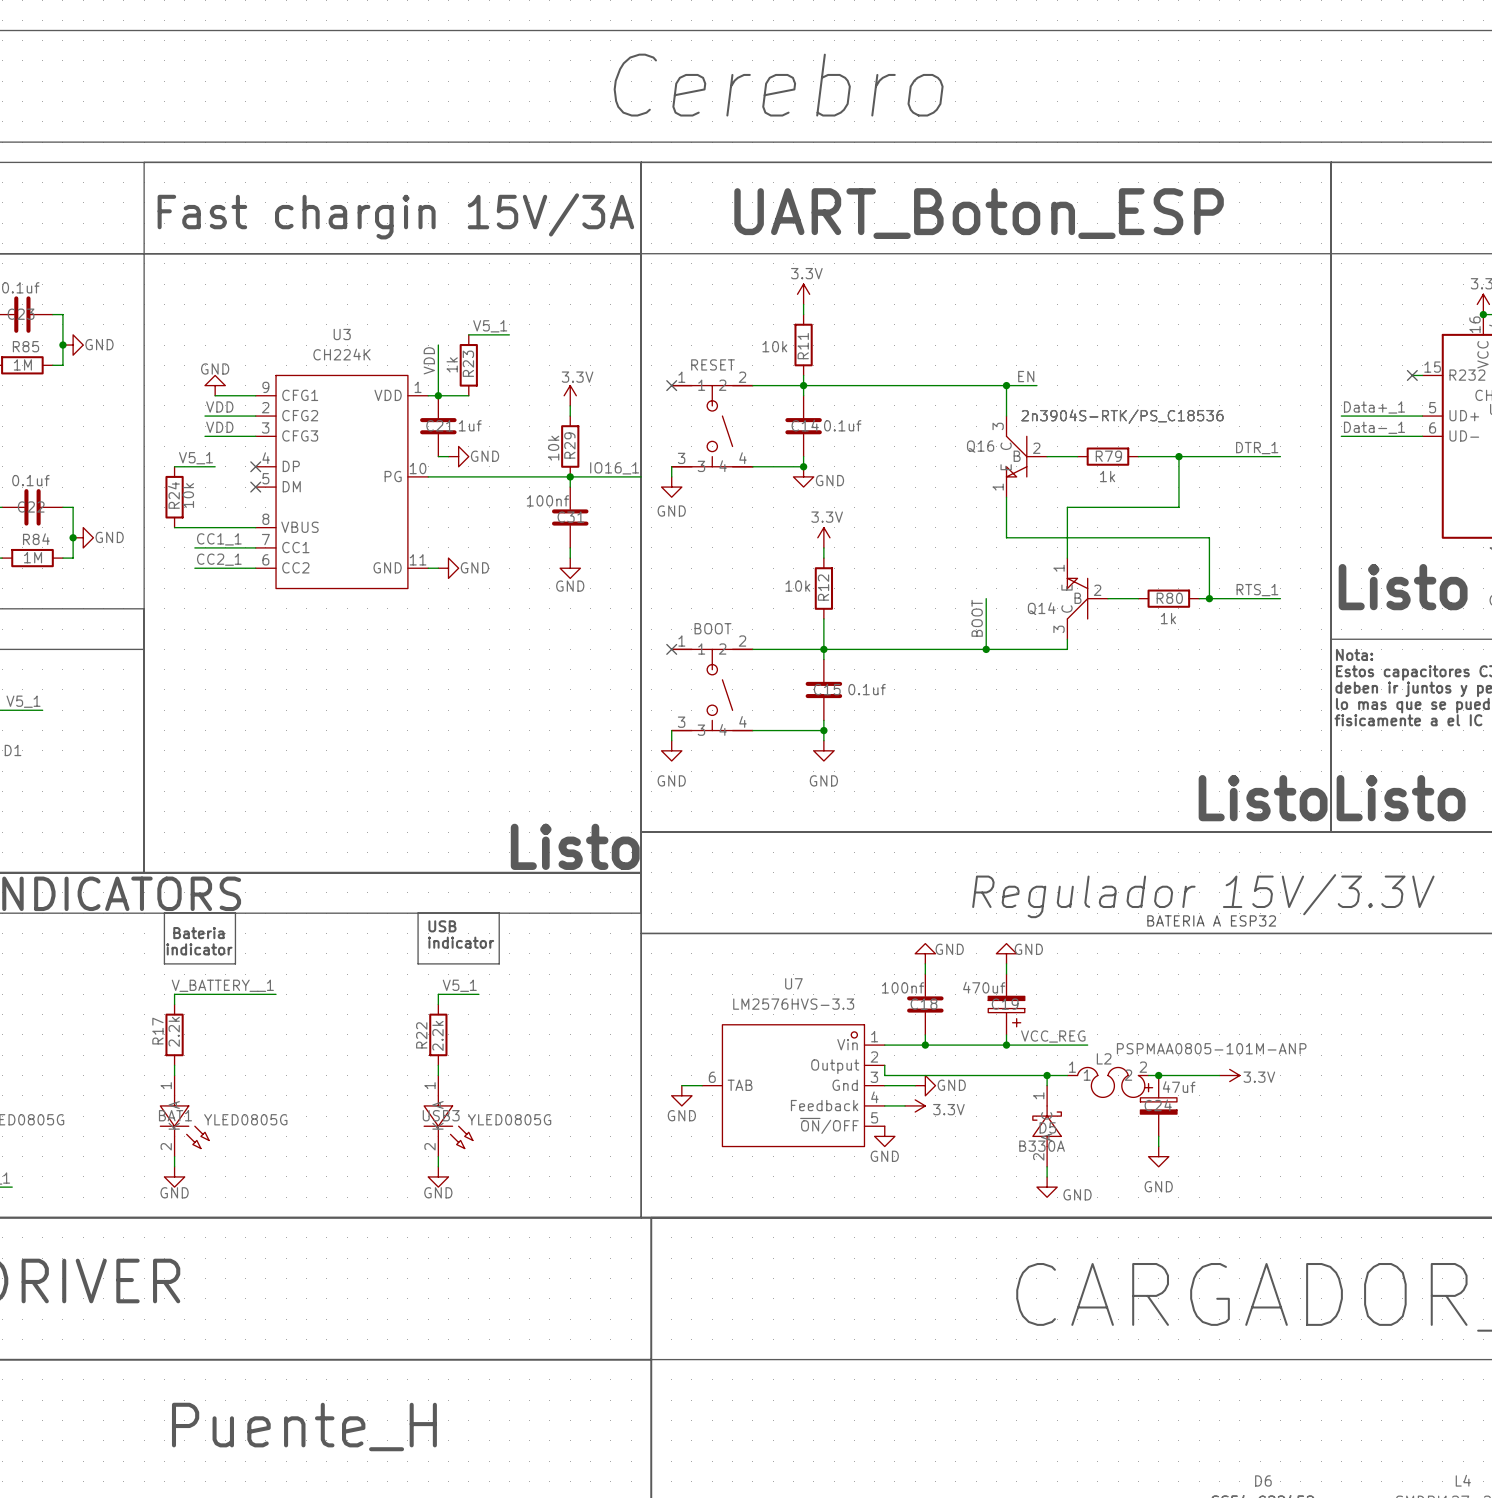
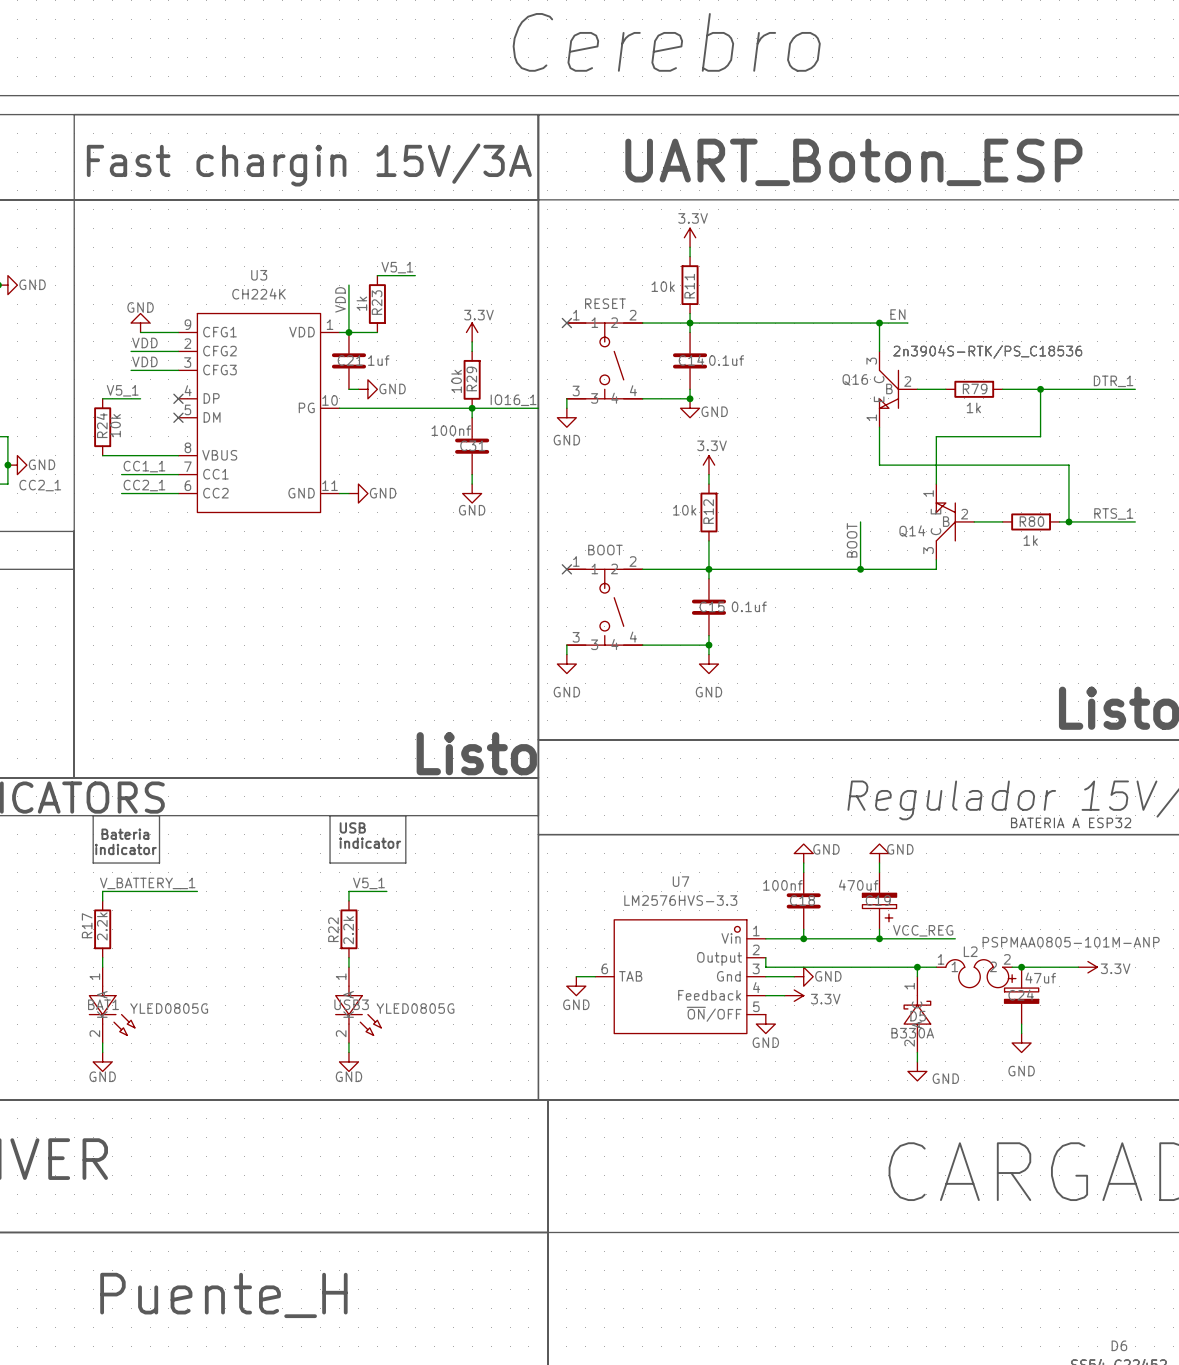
label: none -> CC2_1 (40, 485)

